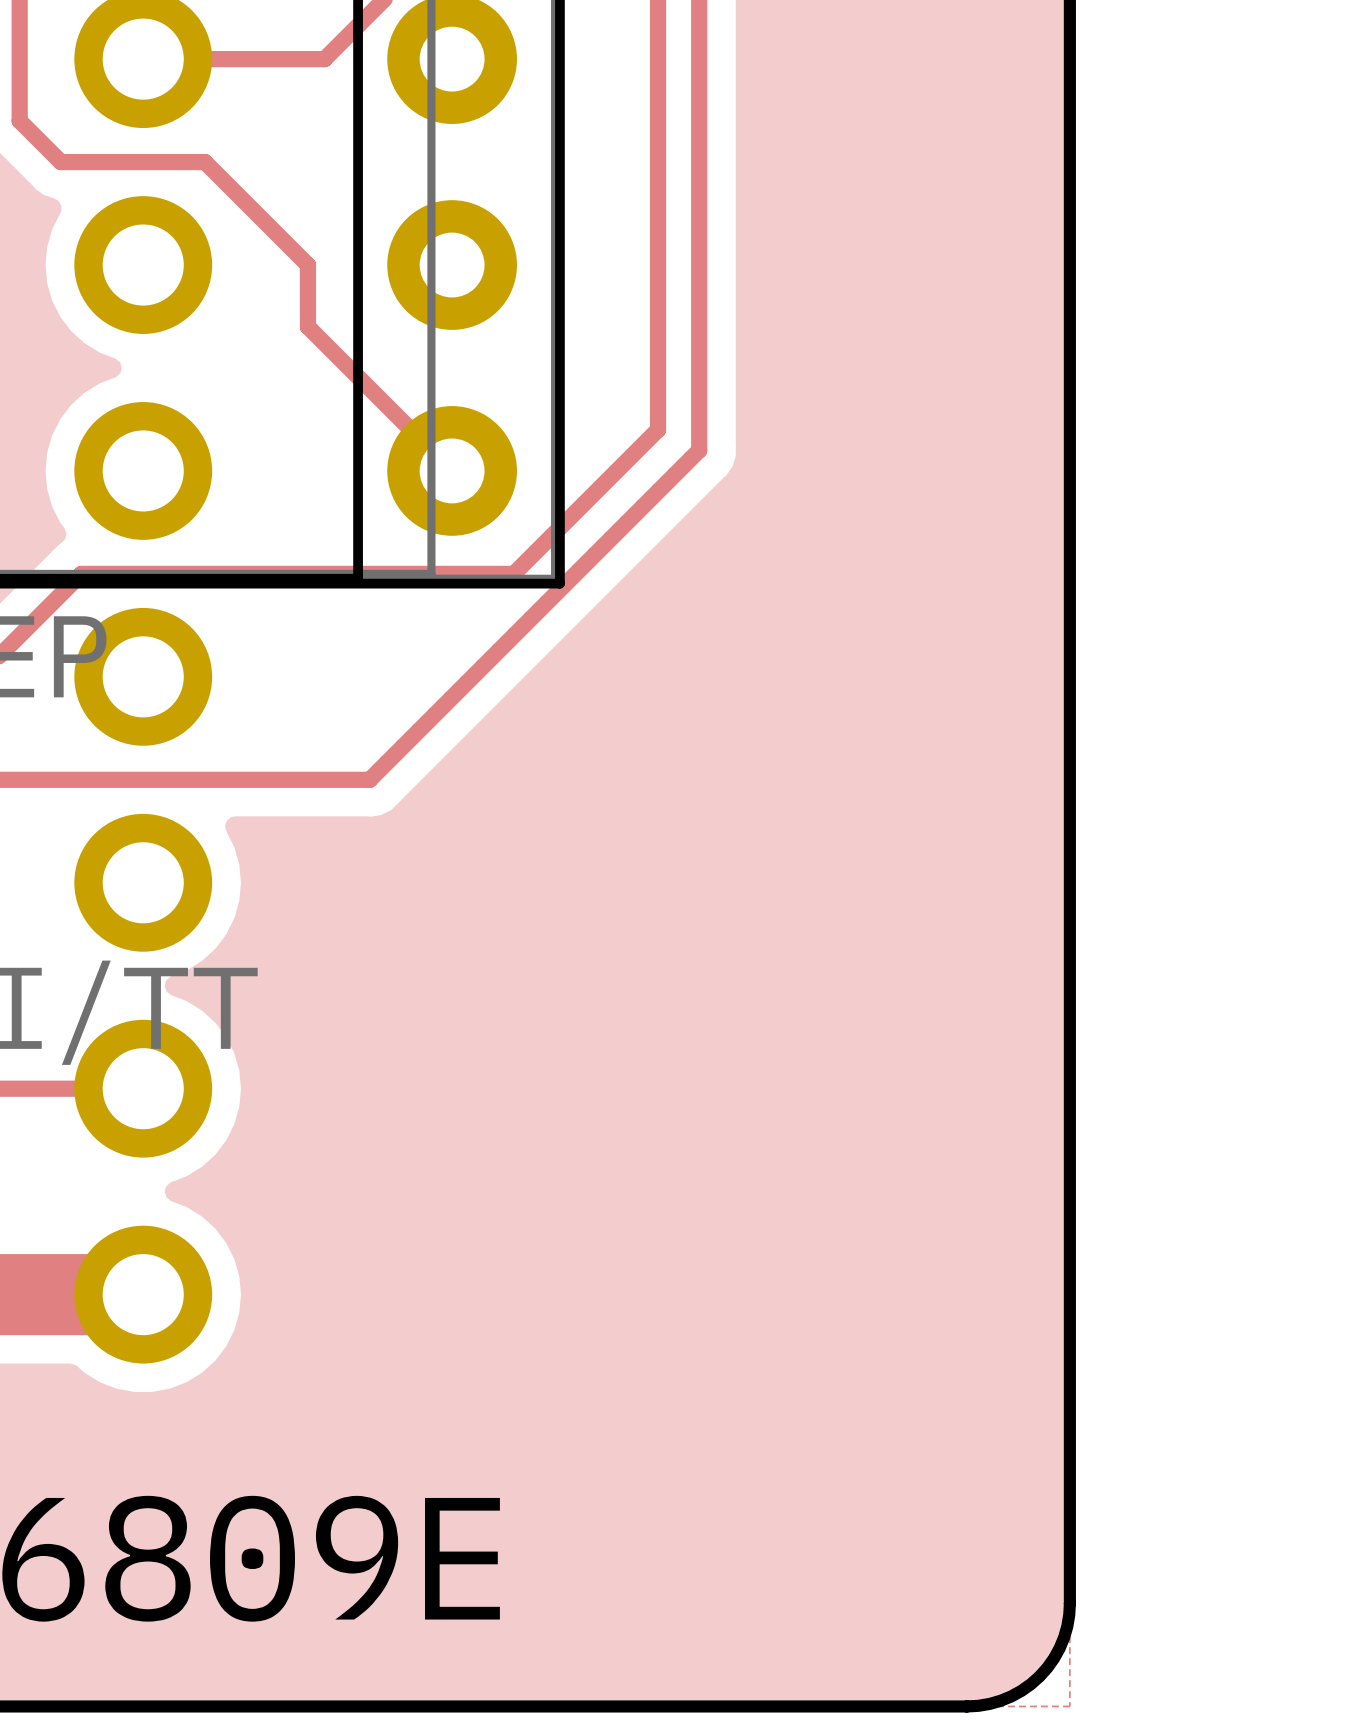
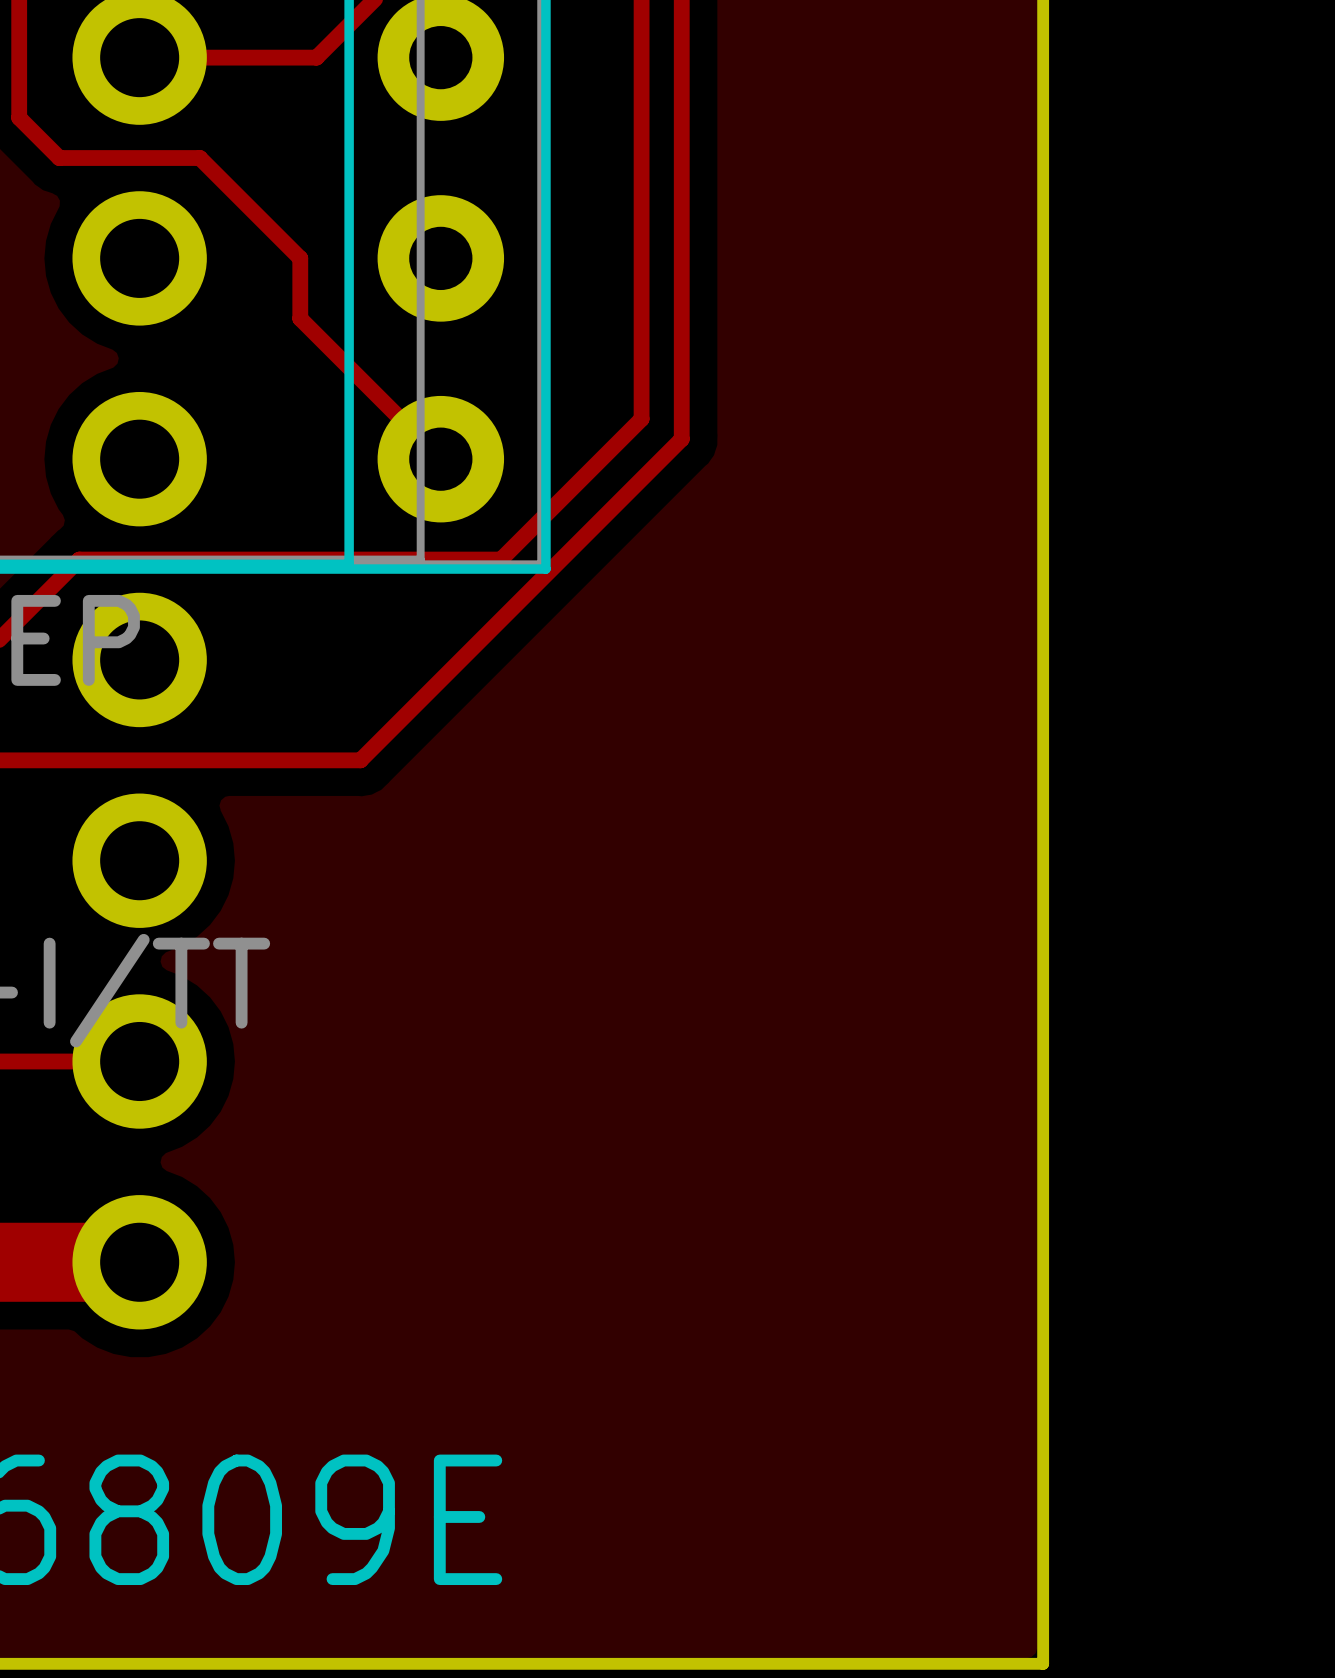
board edge: (1069, 1603) (1064, 1637) (1054, 1658) (1039, 1676) (1021, 1690) (1000, 1700) (966, 1706) -> (1043, 1563) (1043, 1663) (942, 1663)

